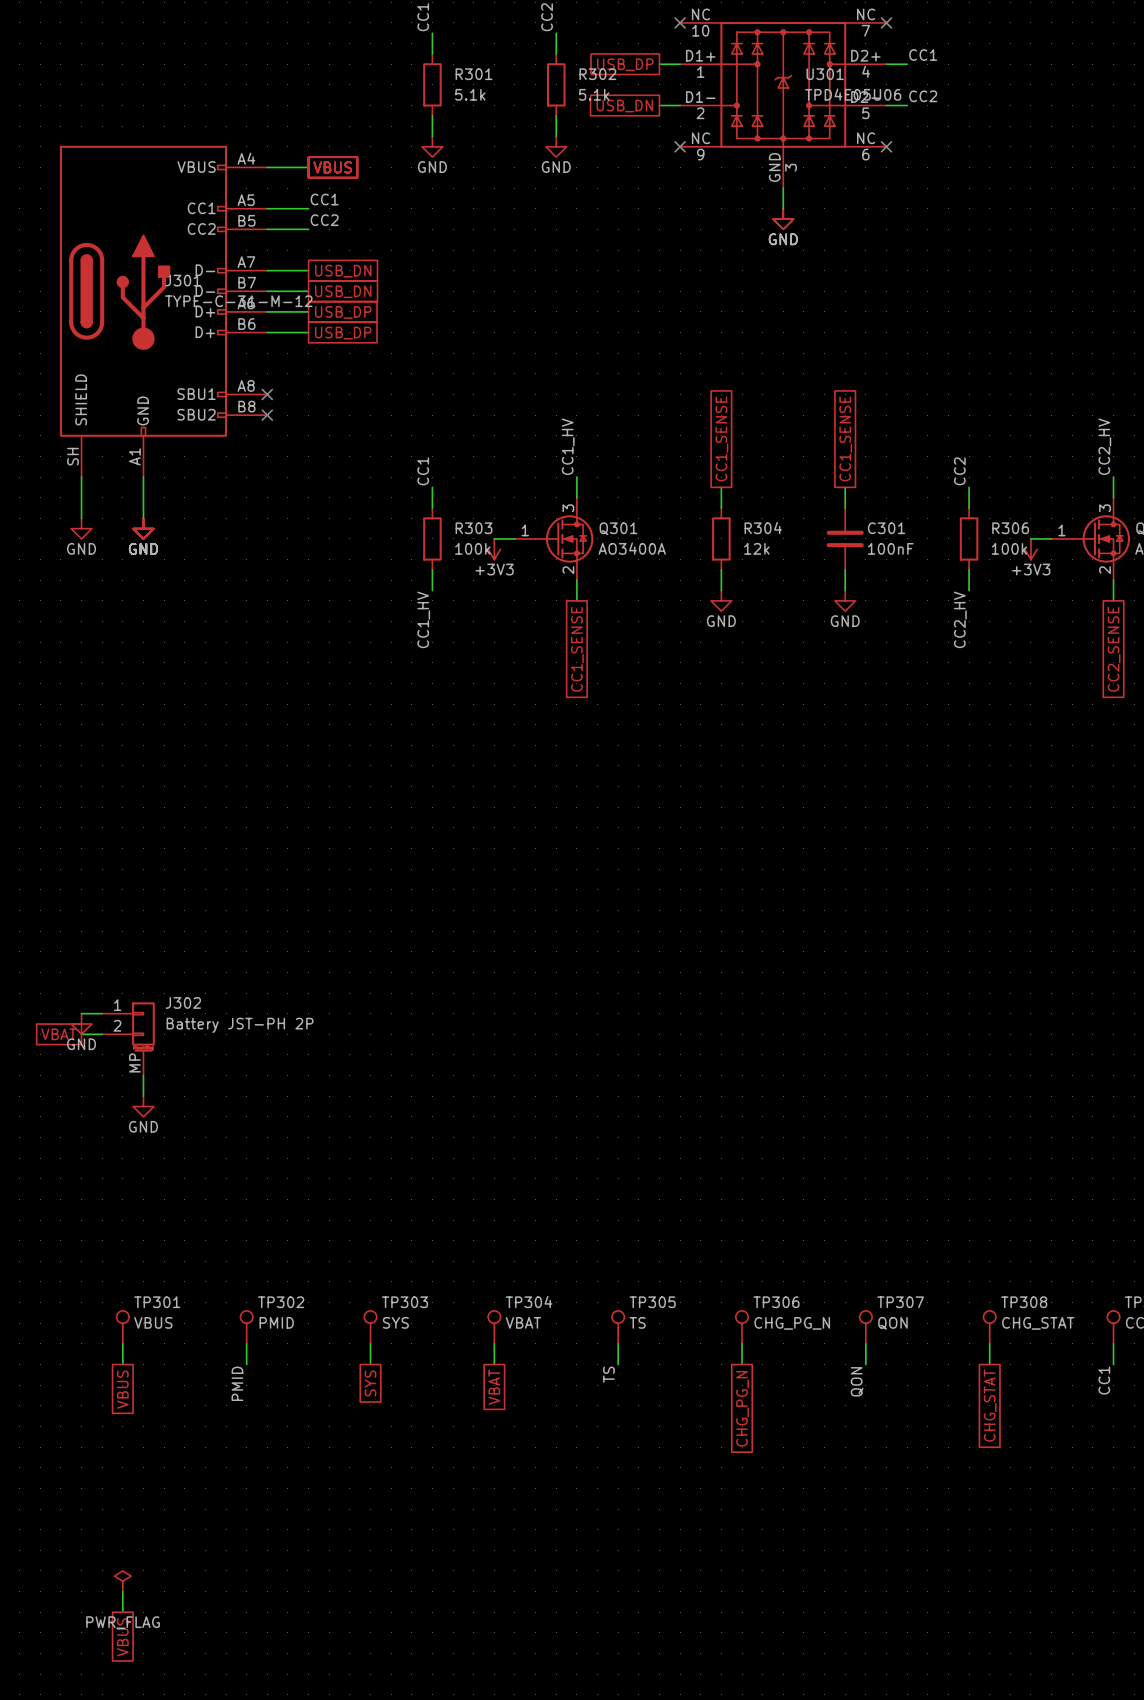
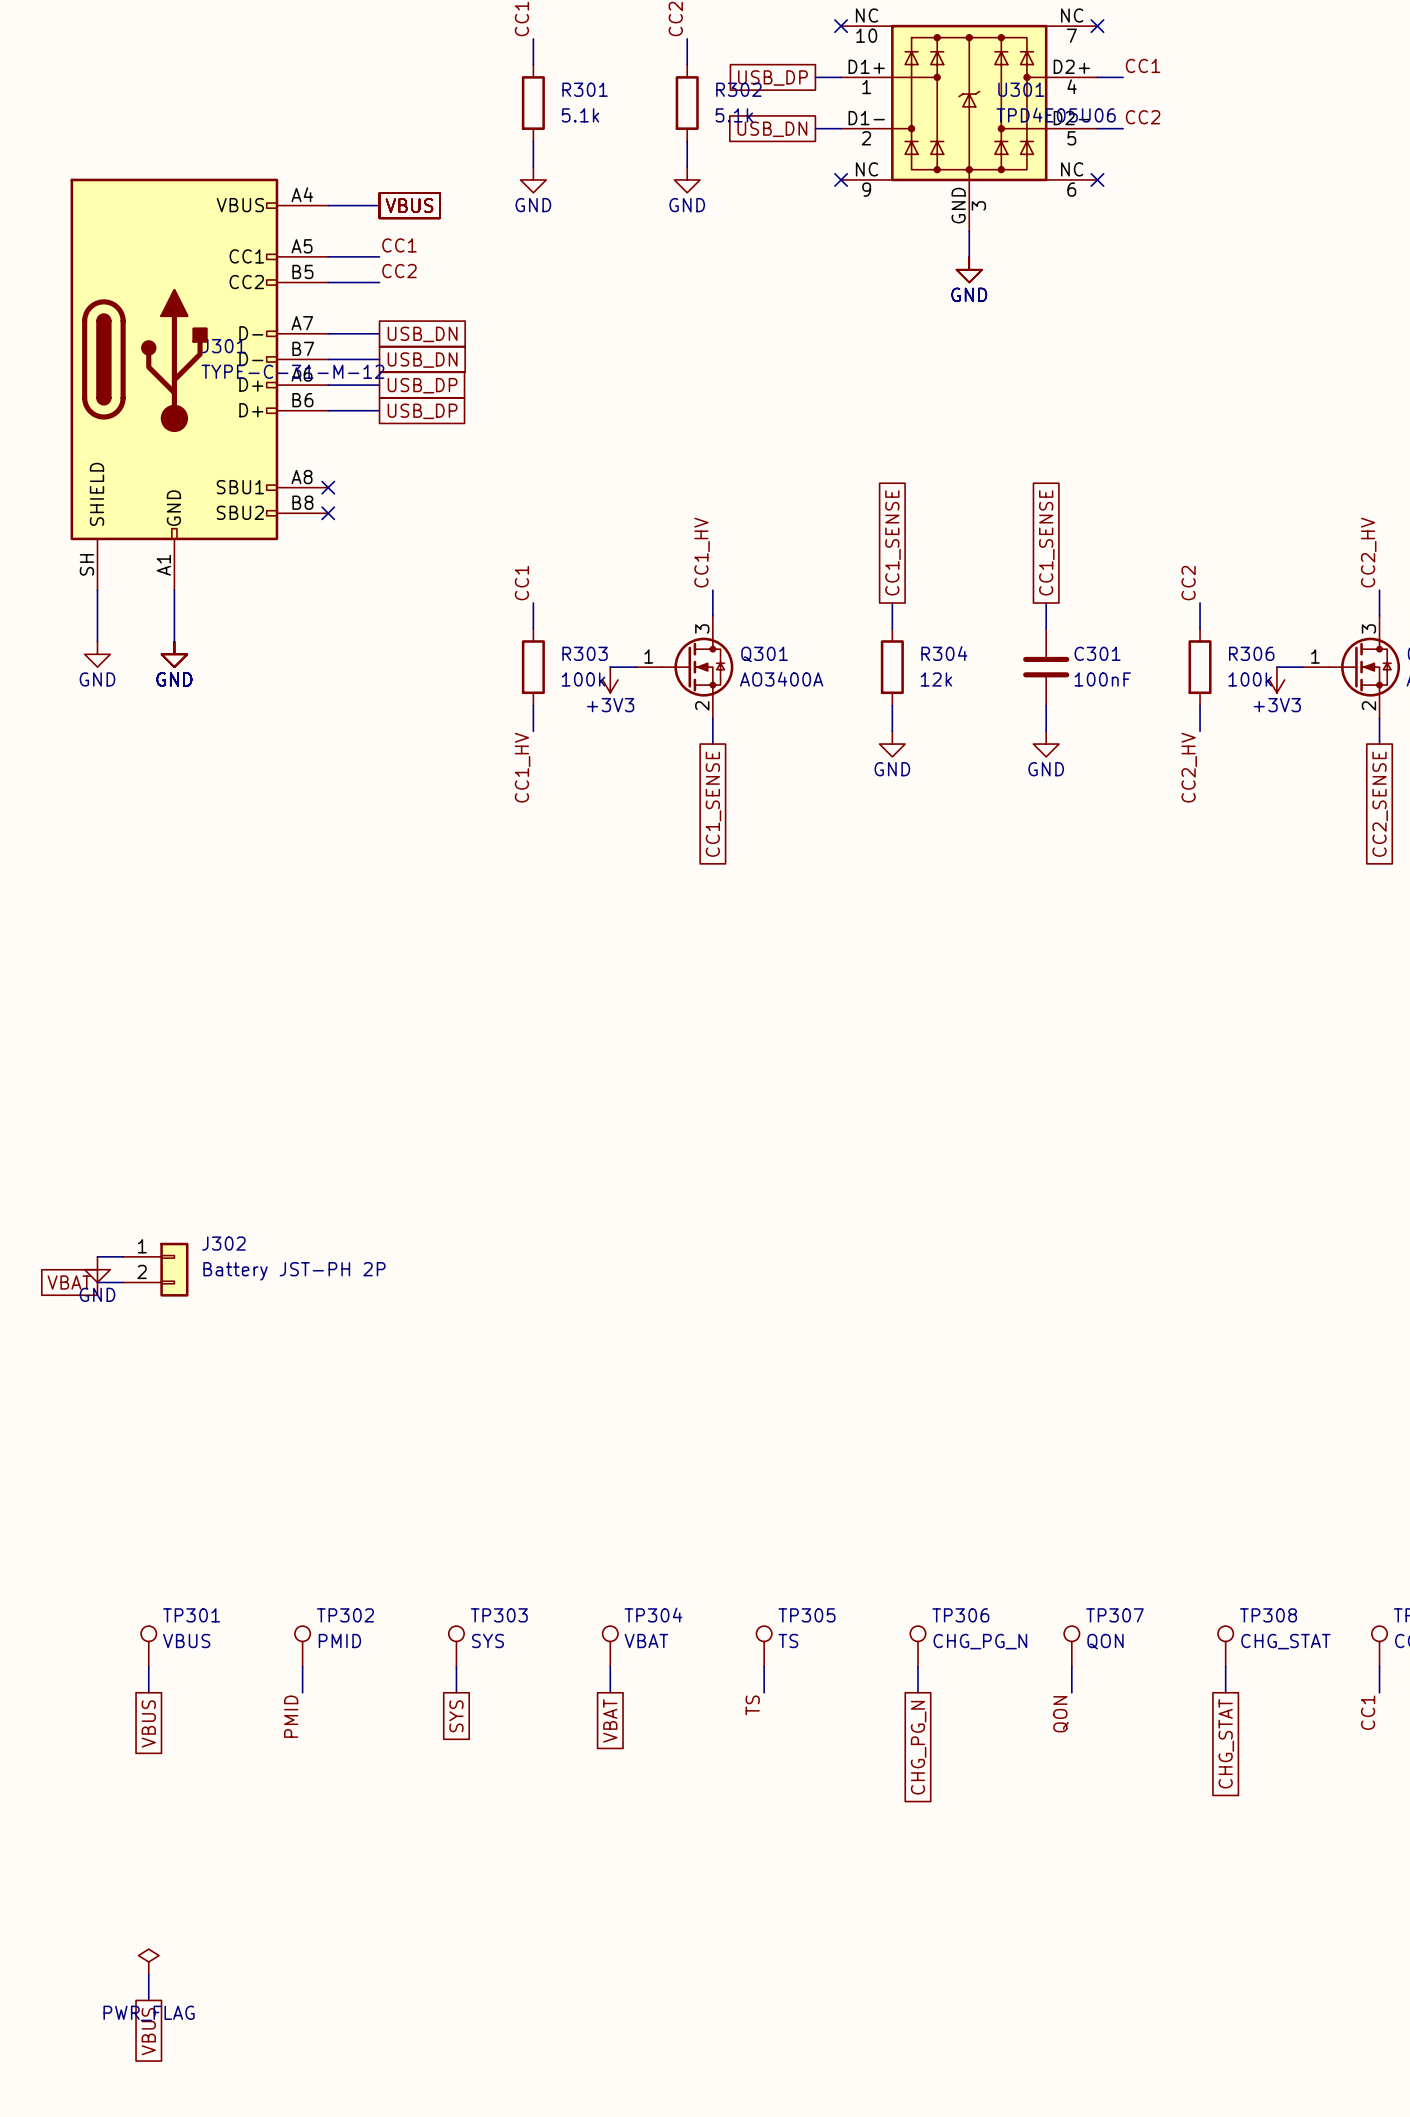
J302 symbol: [102, 1002, 155, 1076] -> [123, 1242, 189, 1297]
wire: (143, 1075) (143, 1096) -> none
power symbol: GND (143, 1106) -> none

